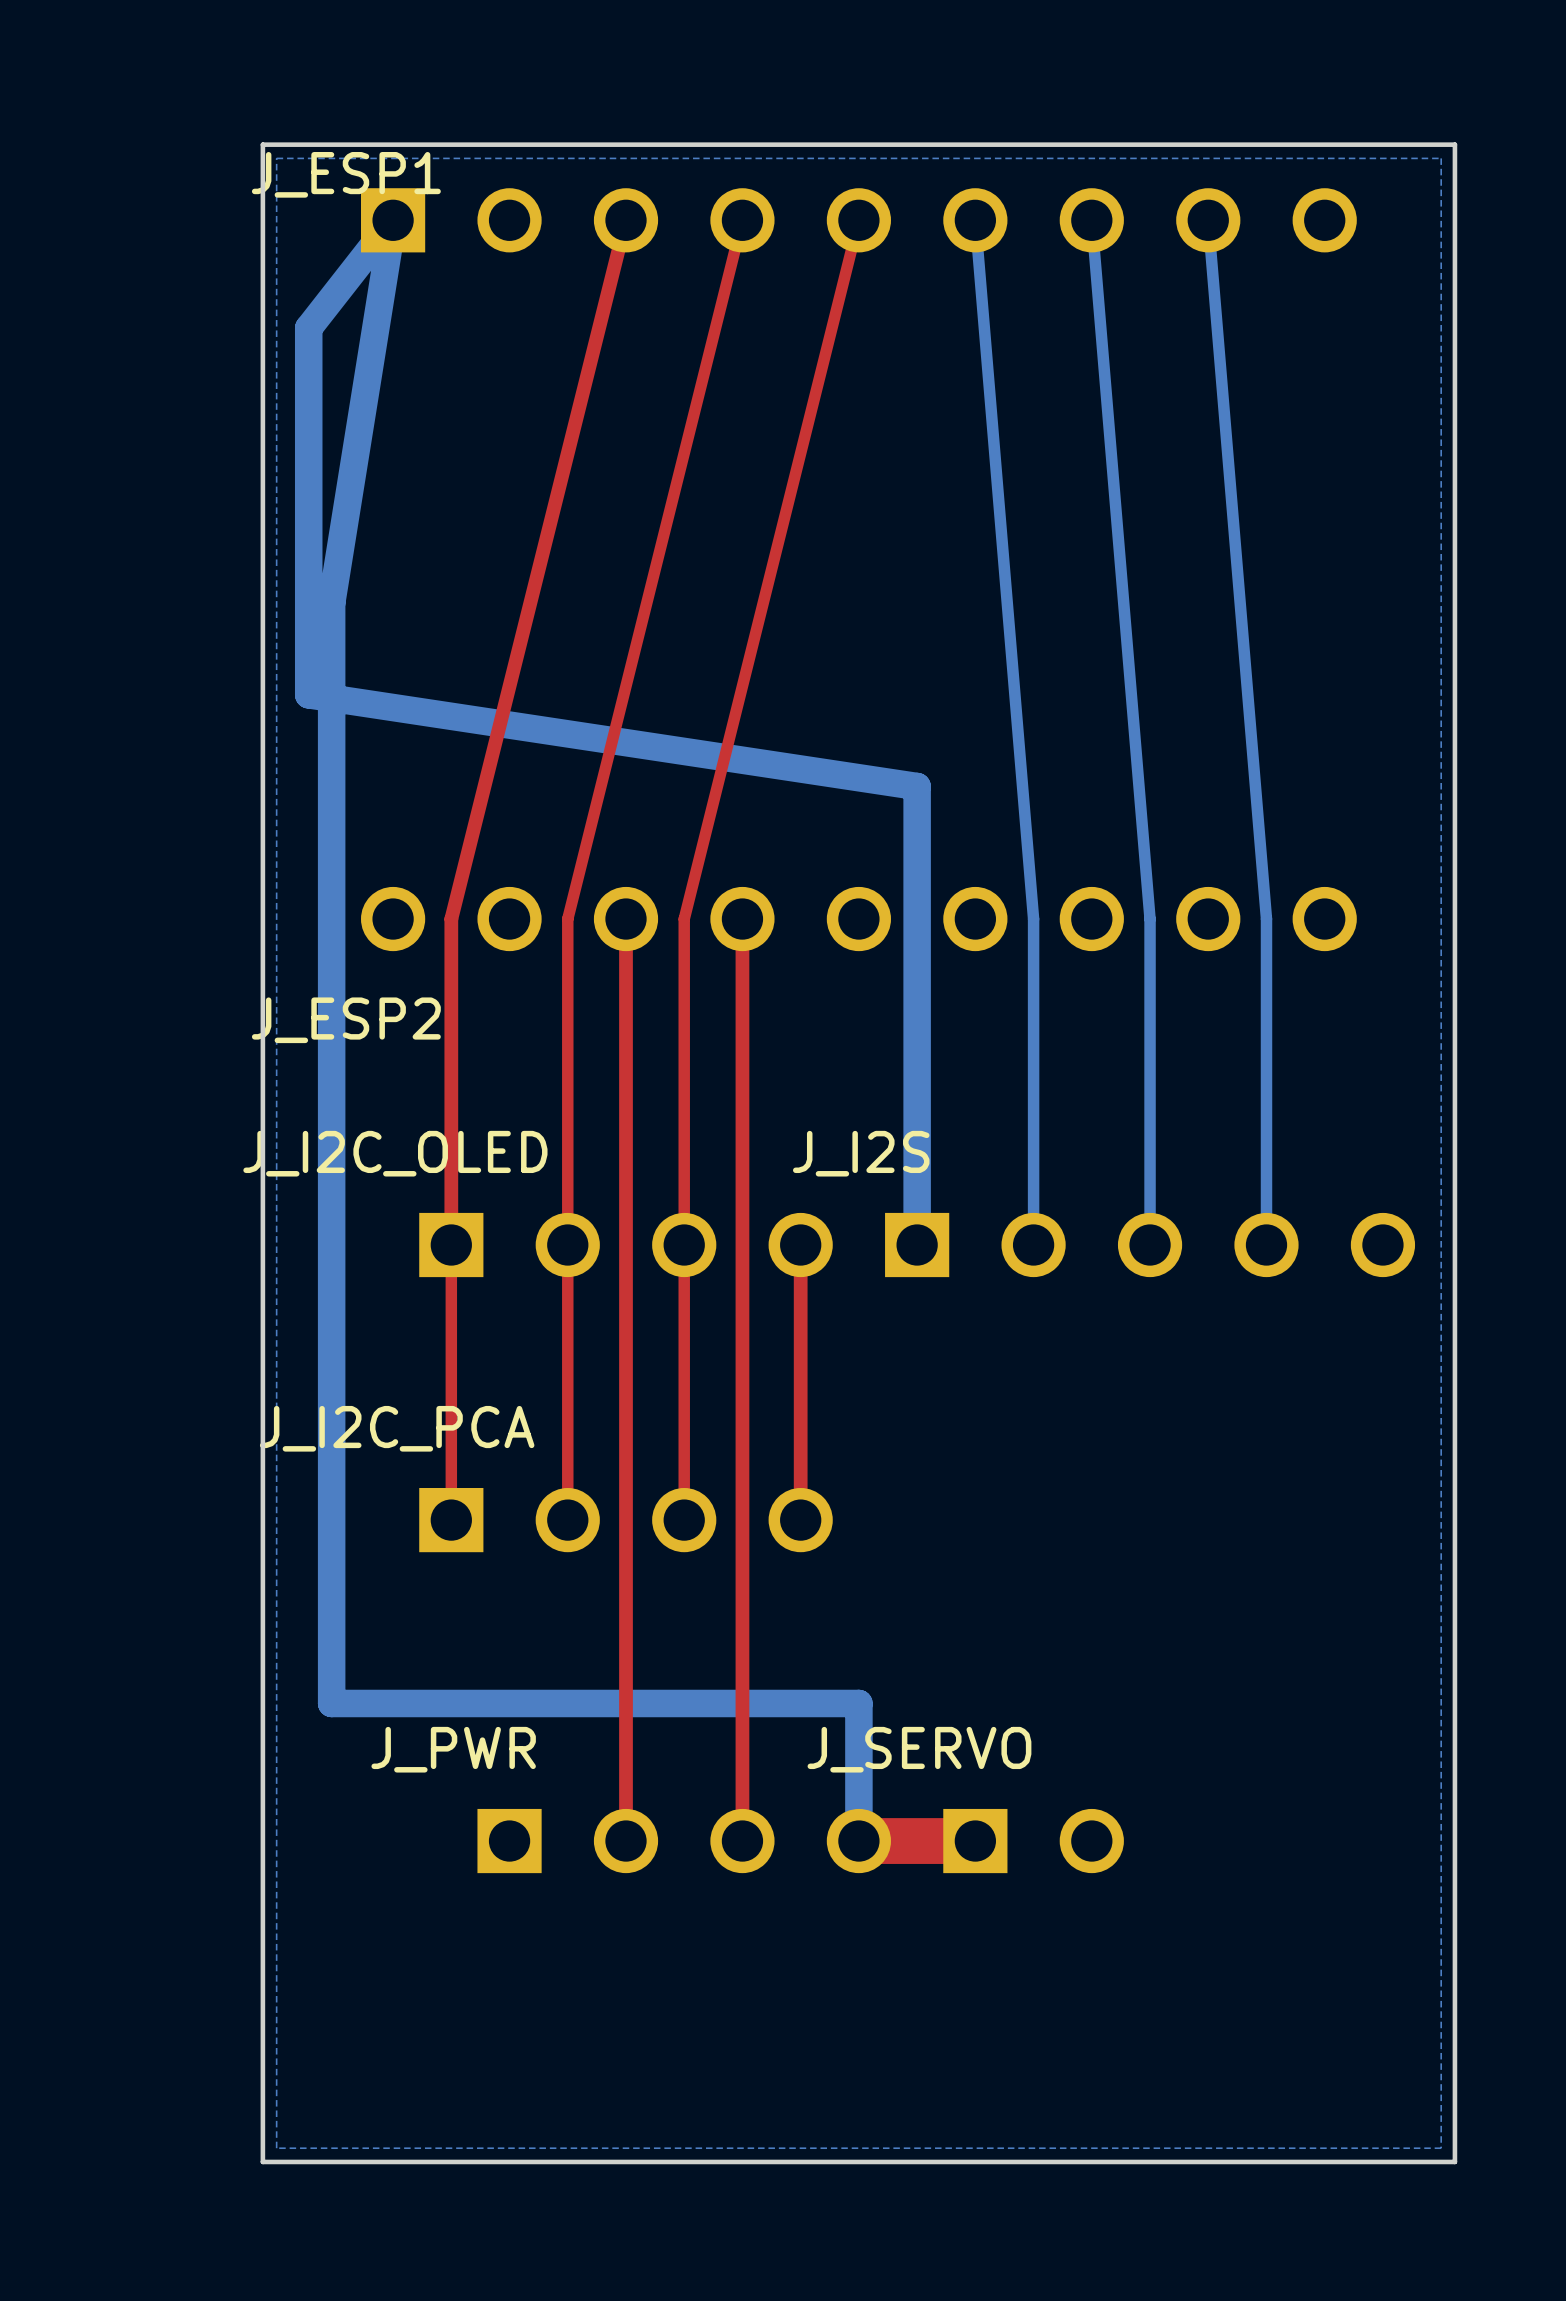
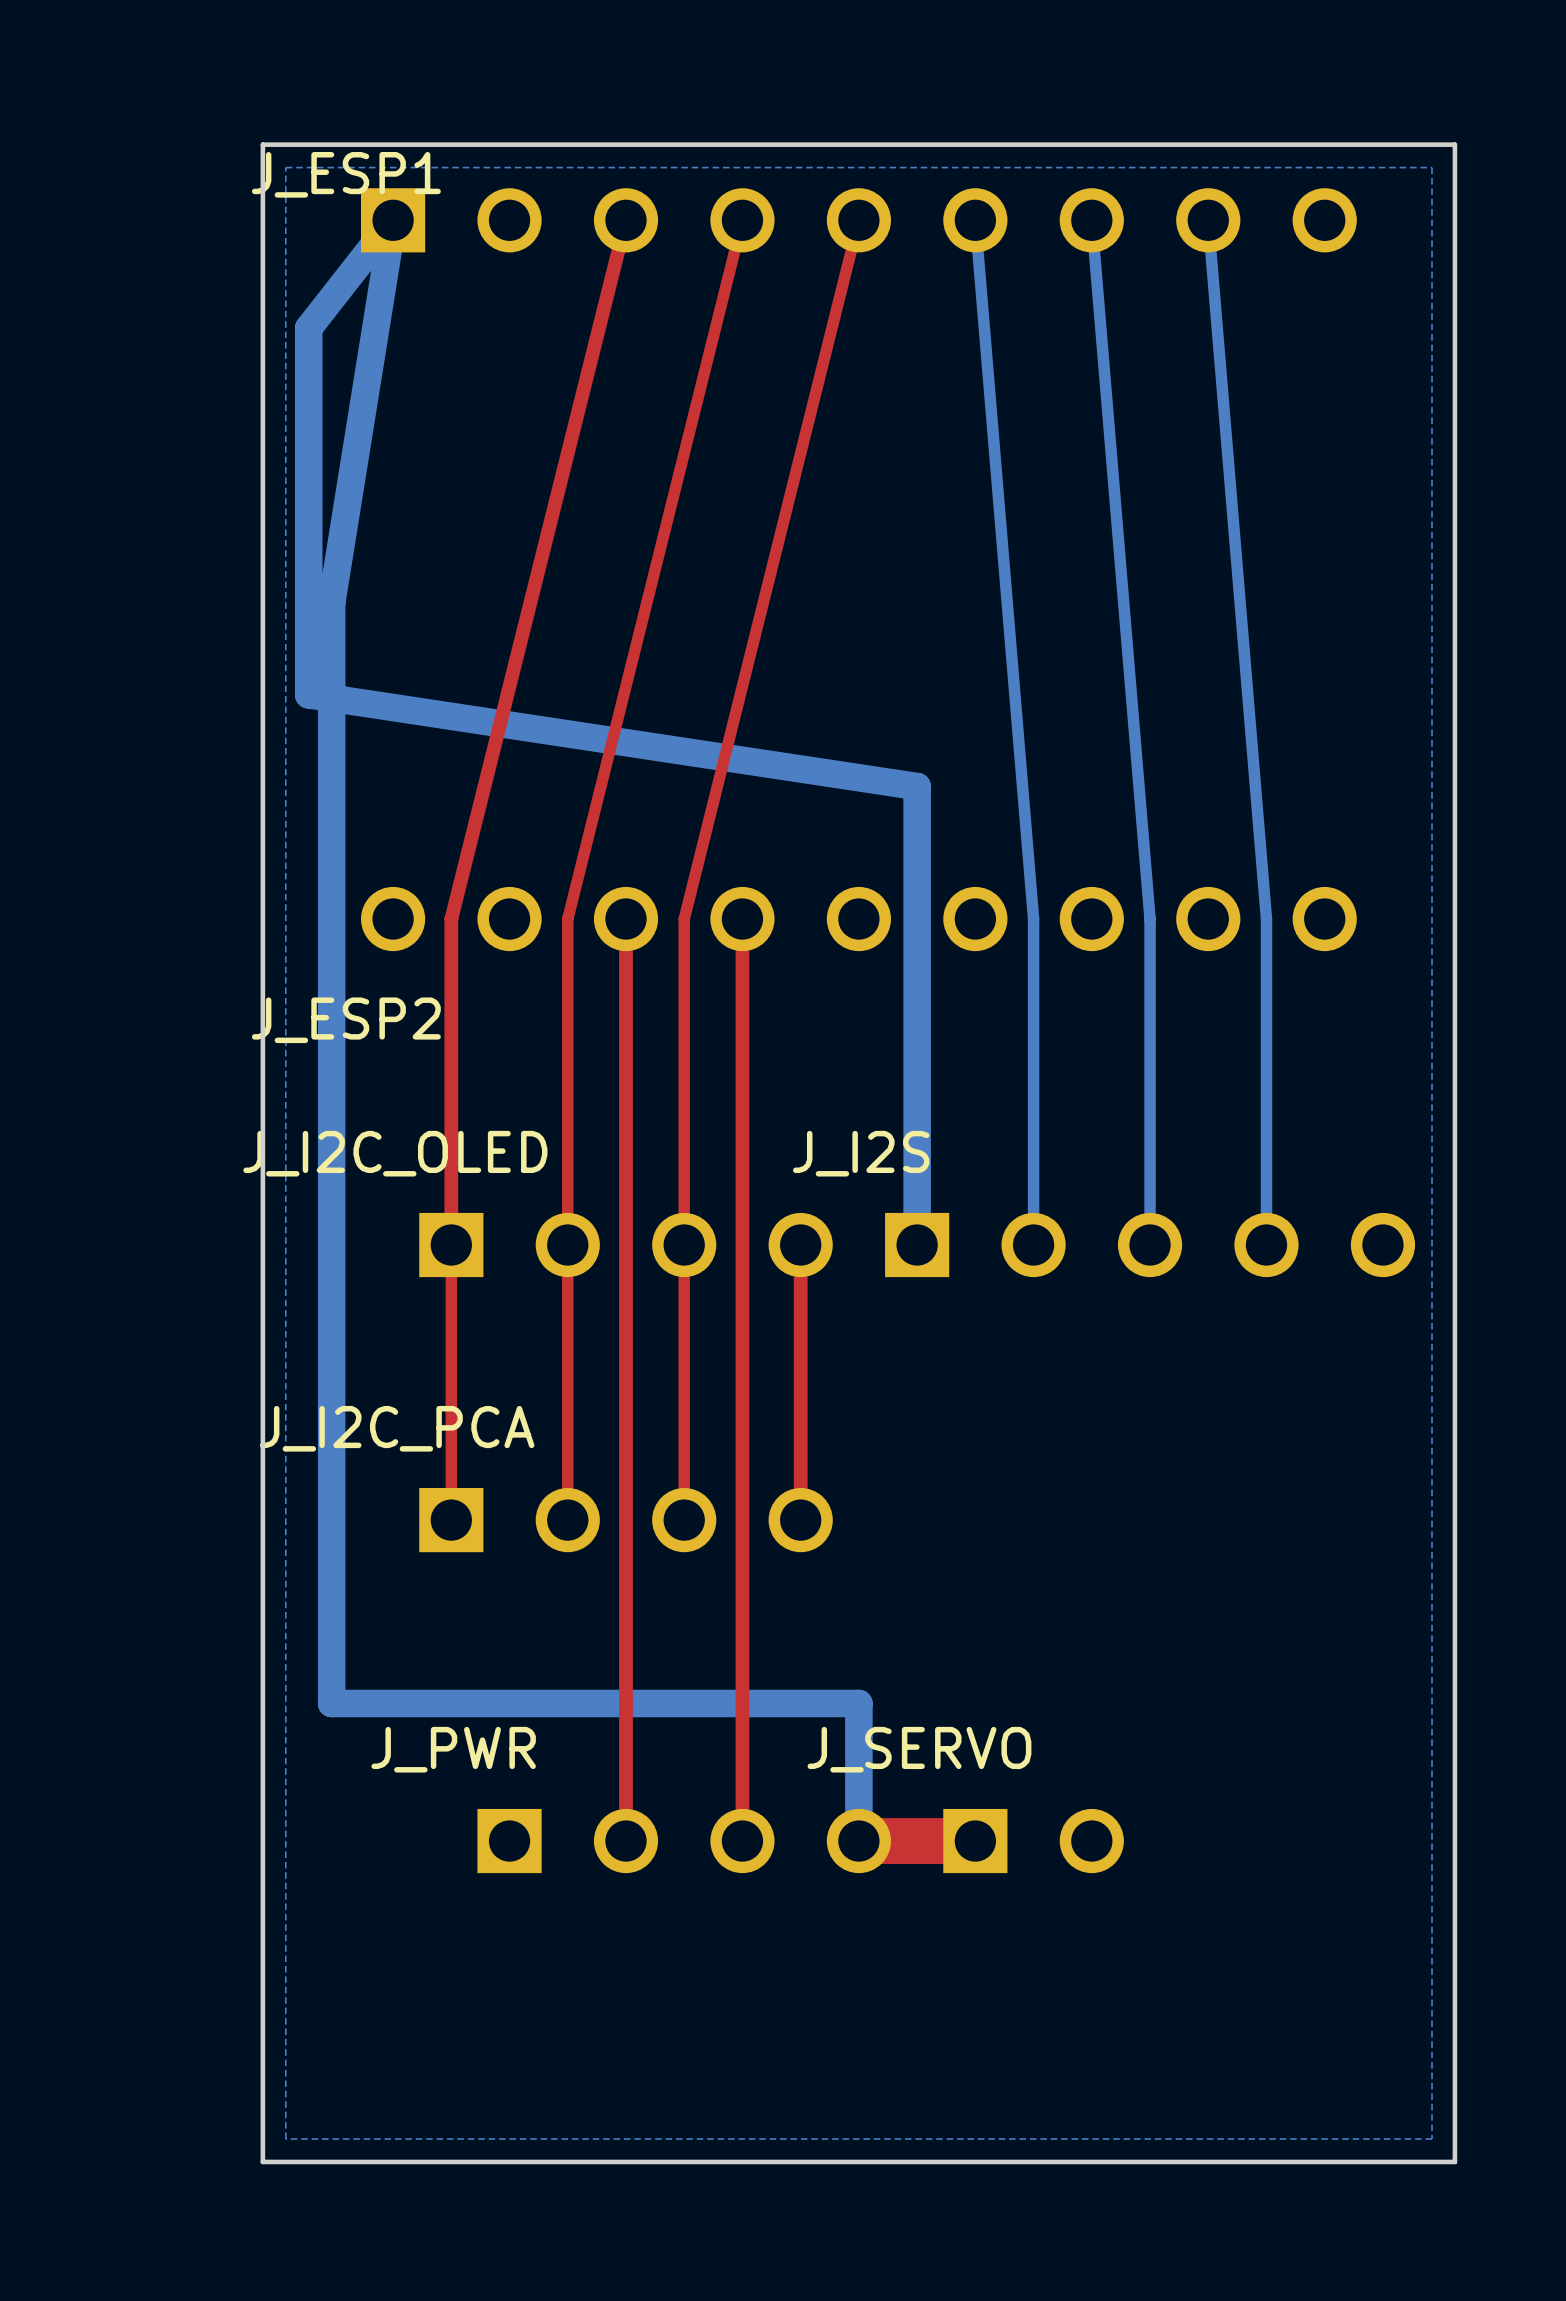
bottom zone outline: (276, 158) (1441, 158) (1441, 2148) (276, 2148) (276, 158) -> (285, 167) (285, 2139) (1432, 2139) (1432, 167) (285, 167)

